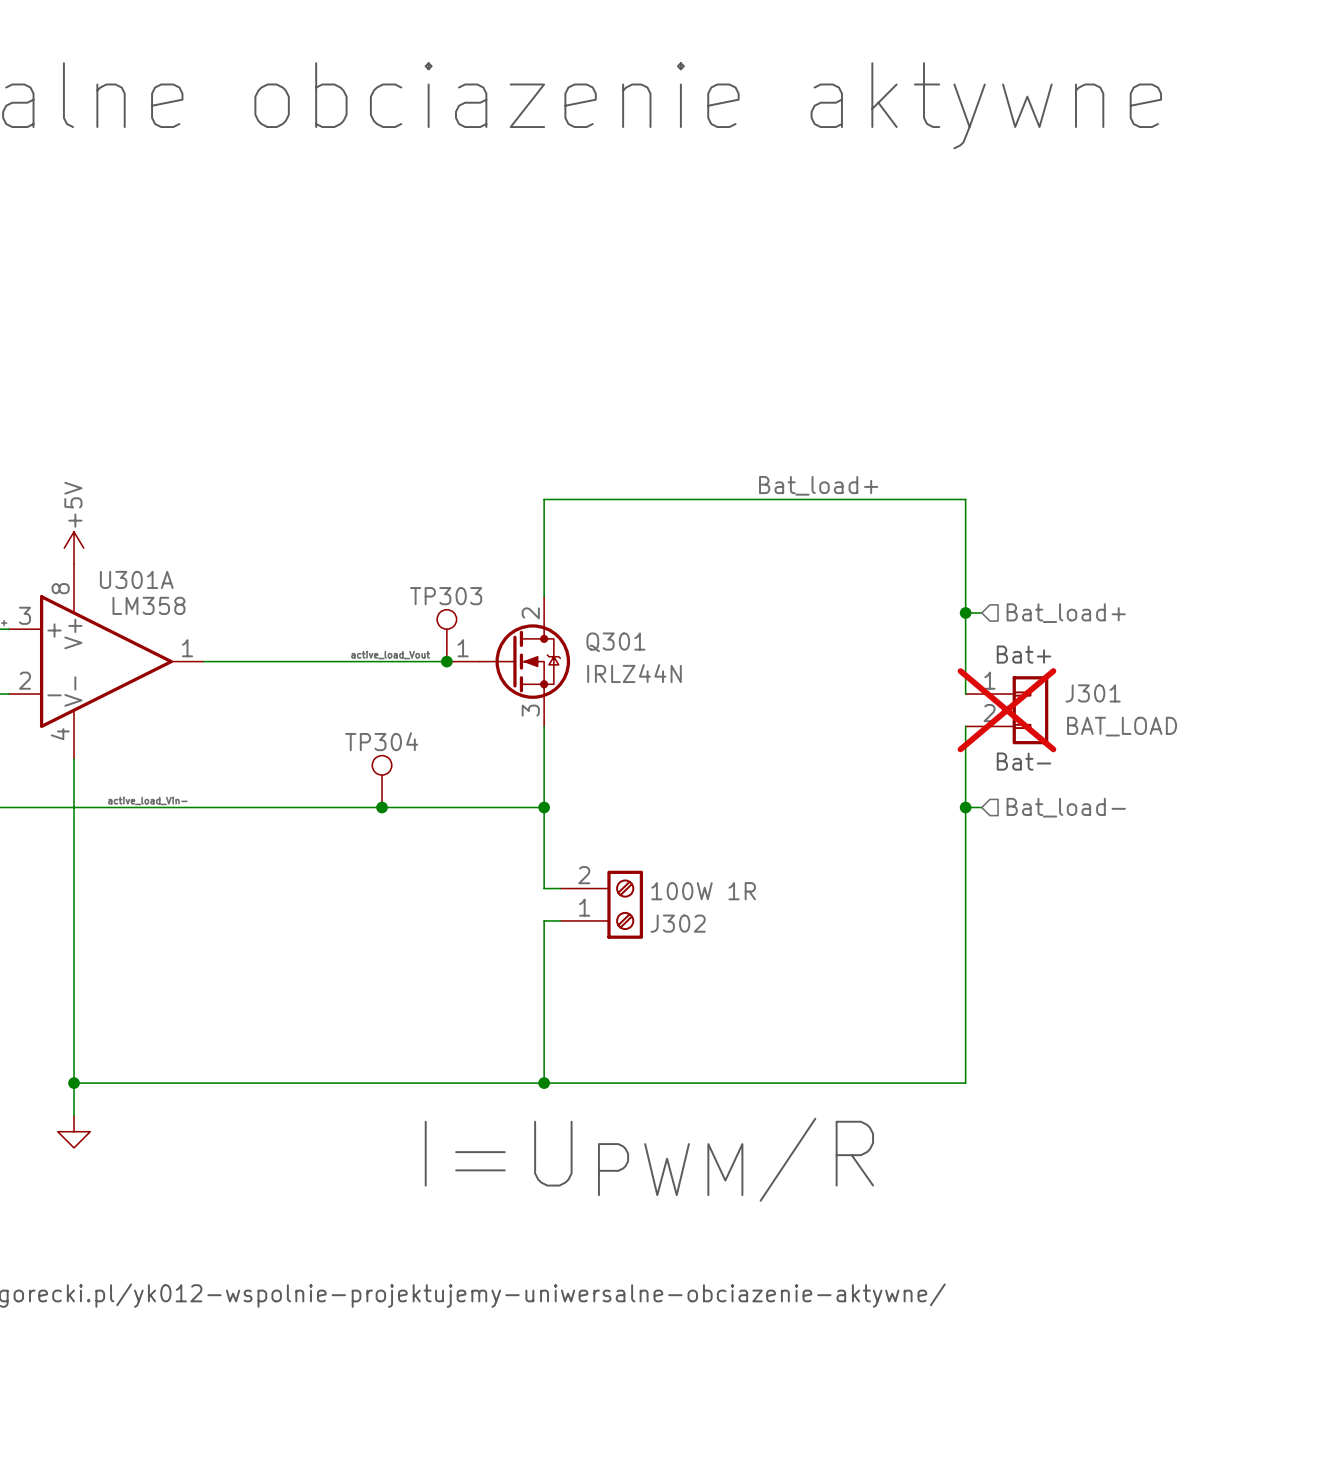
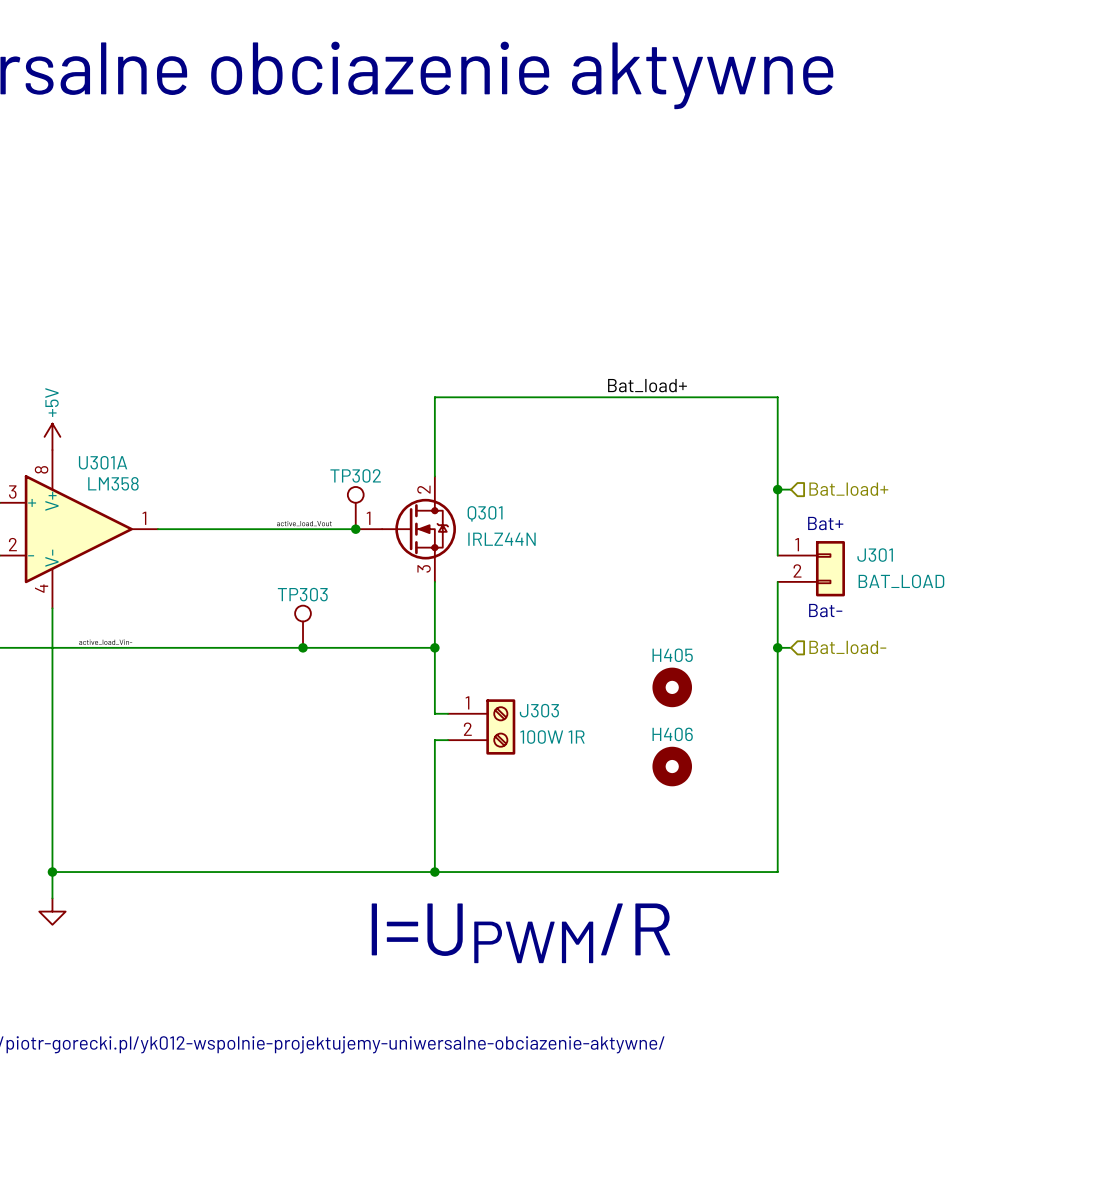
TP303 name: TP303 (446, 596) -> TP302 (355, 475)
J301 do-not-place cross: (1006, 710) -> none
TP304 name: TP304 (381, 741) -> TP303 (302, 594)
H405: none -> (672, 687)
J302: 100W 1R (601, 904) -> none
J303: none -> 100W 1R (481, 726)
H406: none -> (672, 766)

